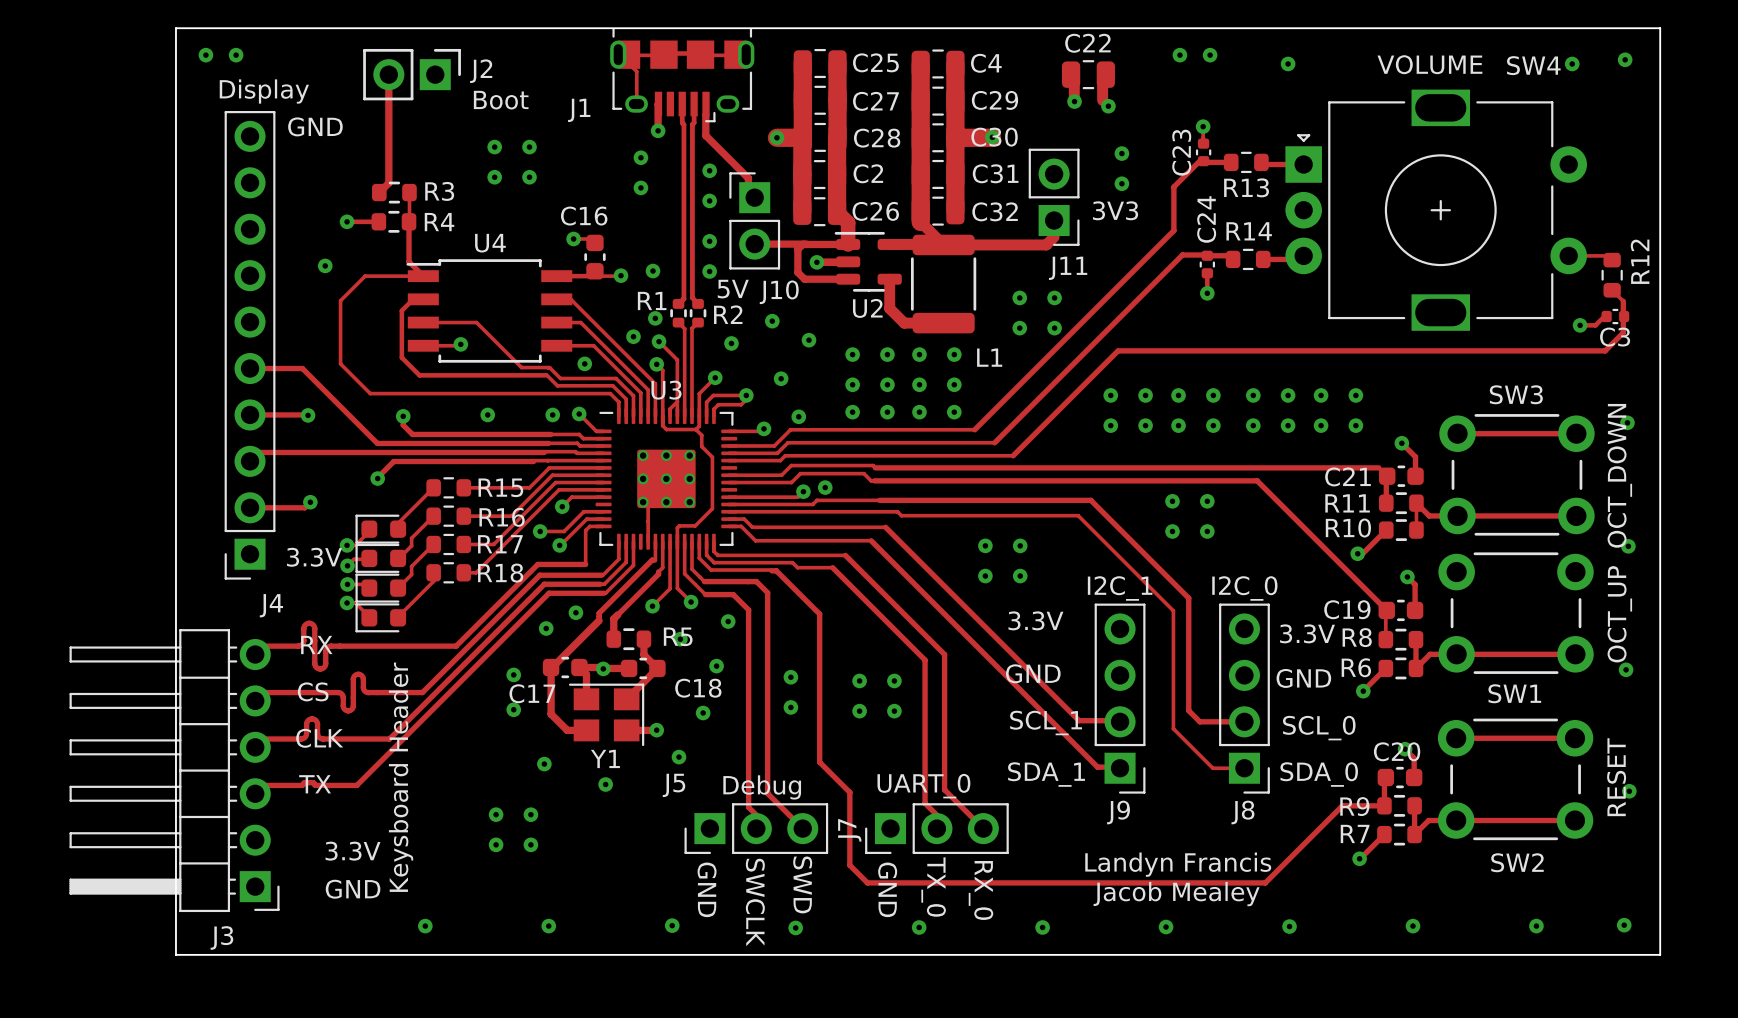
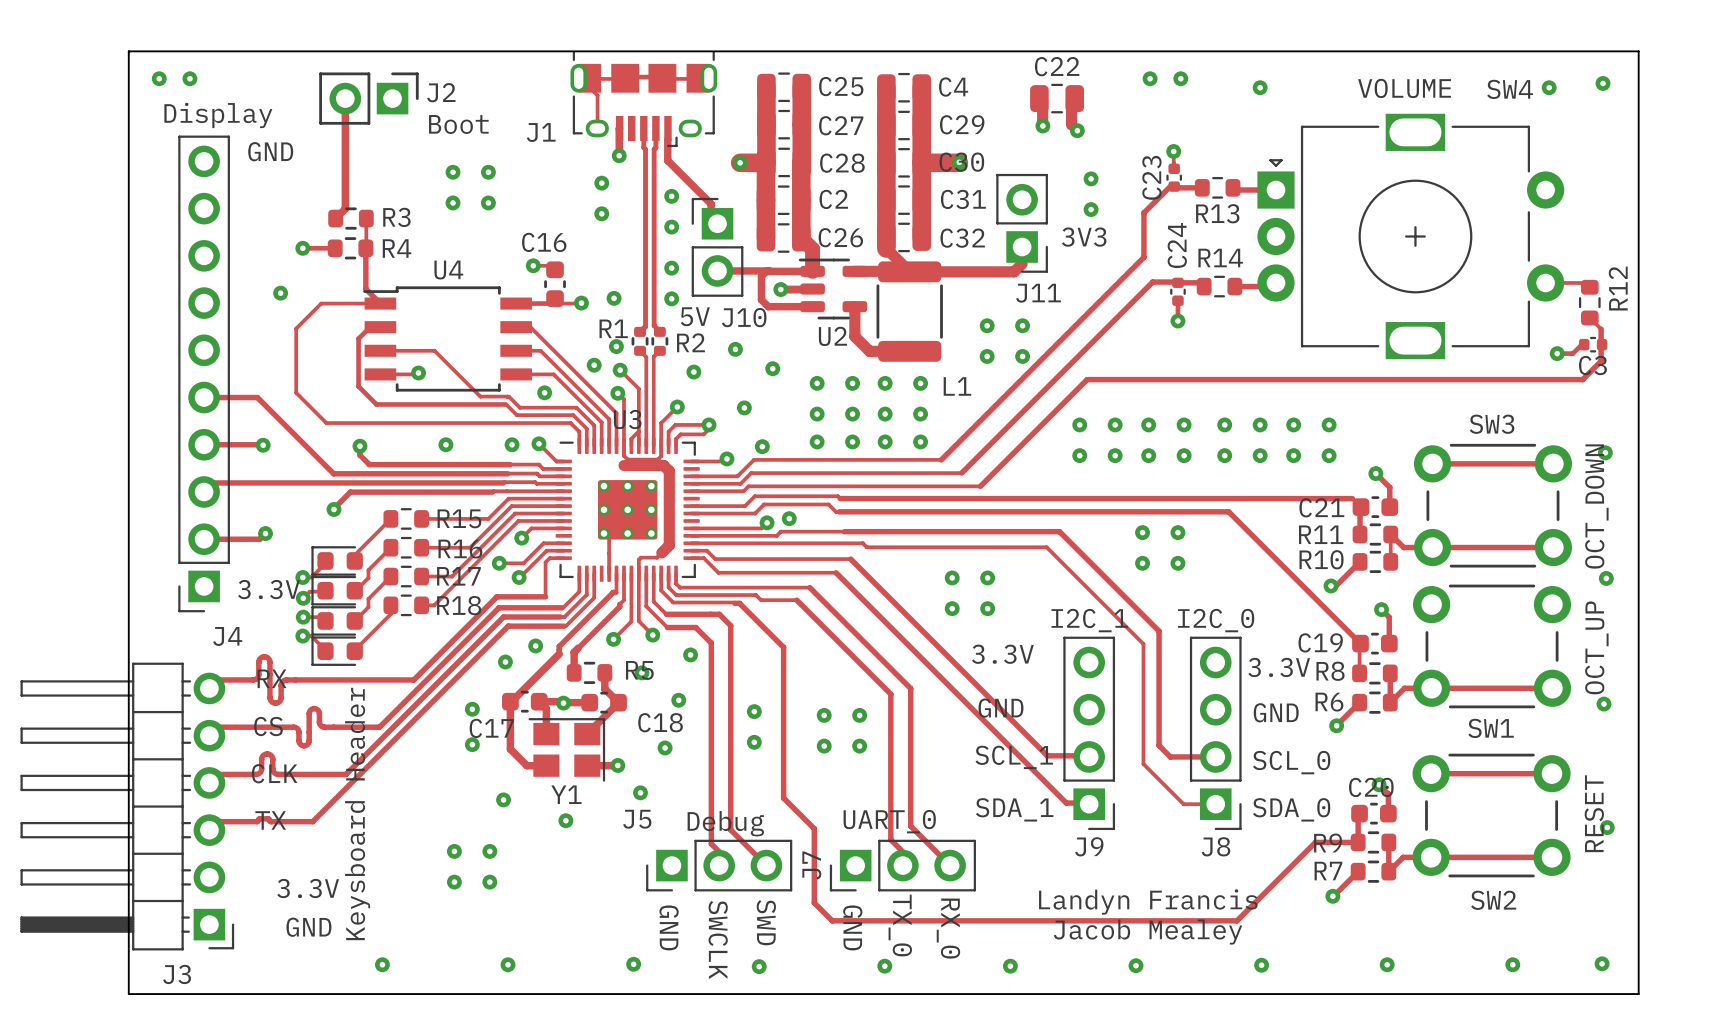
track: (701, 435) (701, 446) (712, 457) (712, 508) (707, 513) -> (624, 465) (663, 465) (669, 471) (669, 545)
track width: thin (707, 513) (699, 521) -> thick (669, 545) (661, 552)

